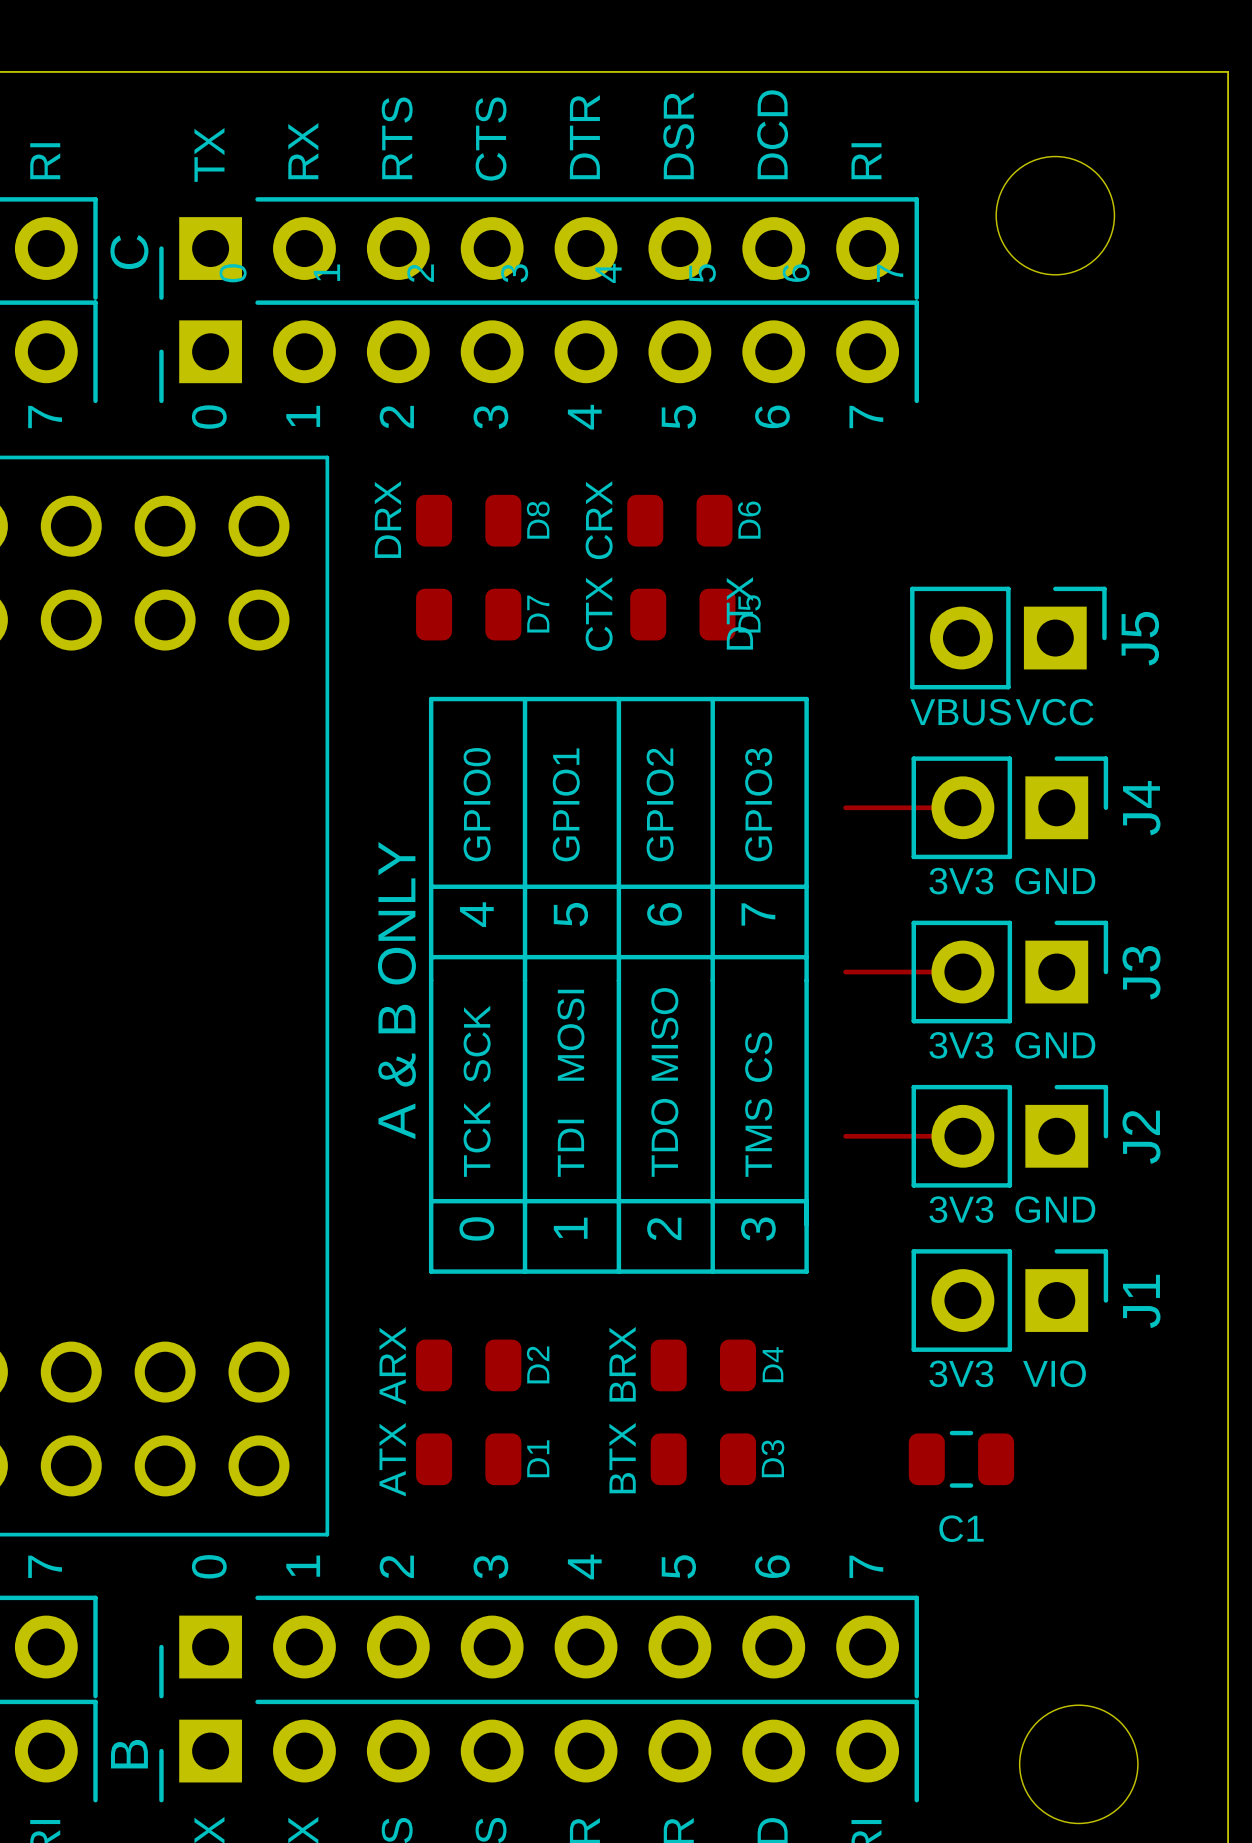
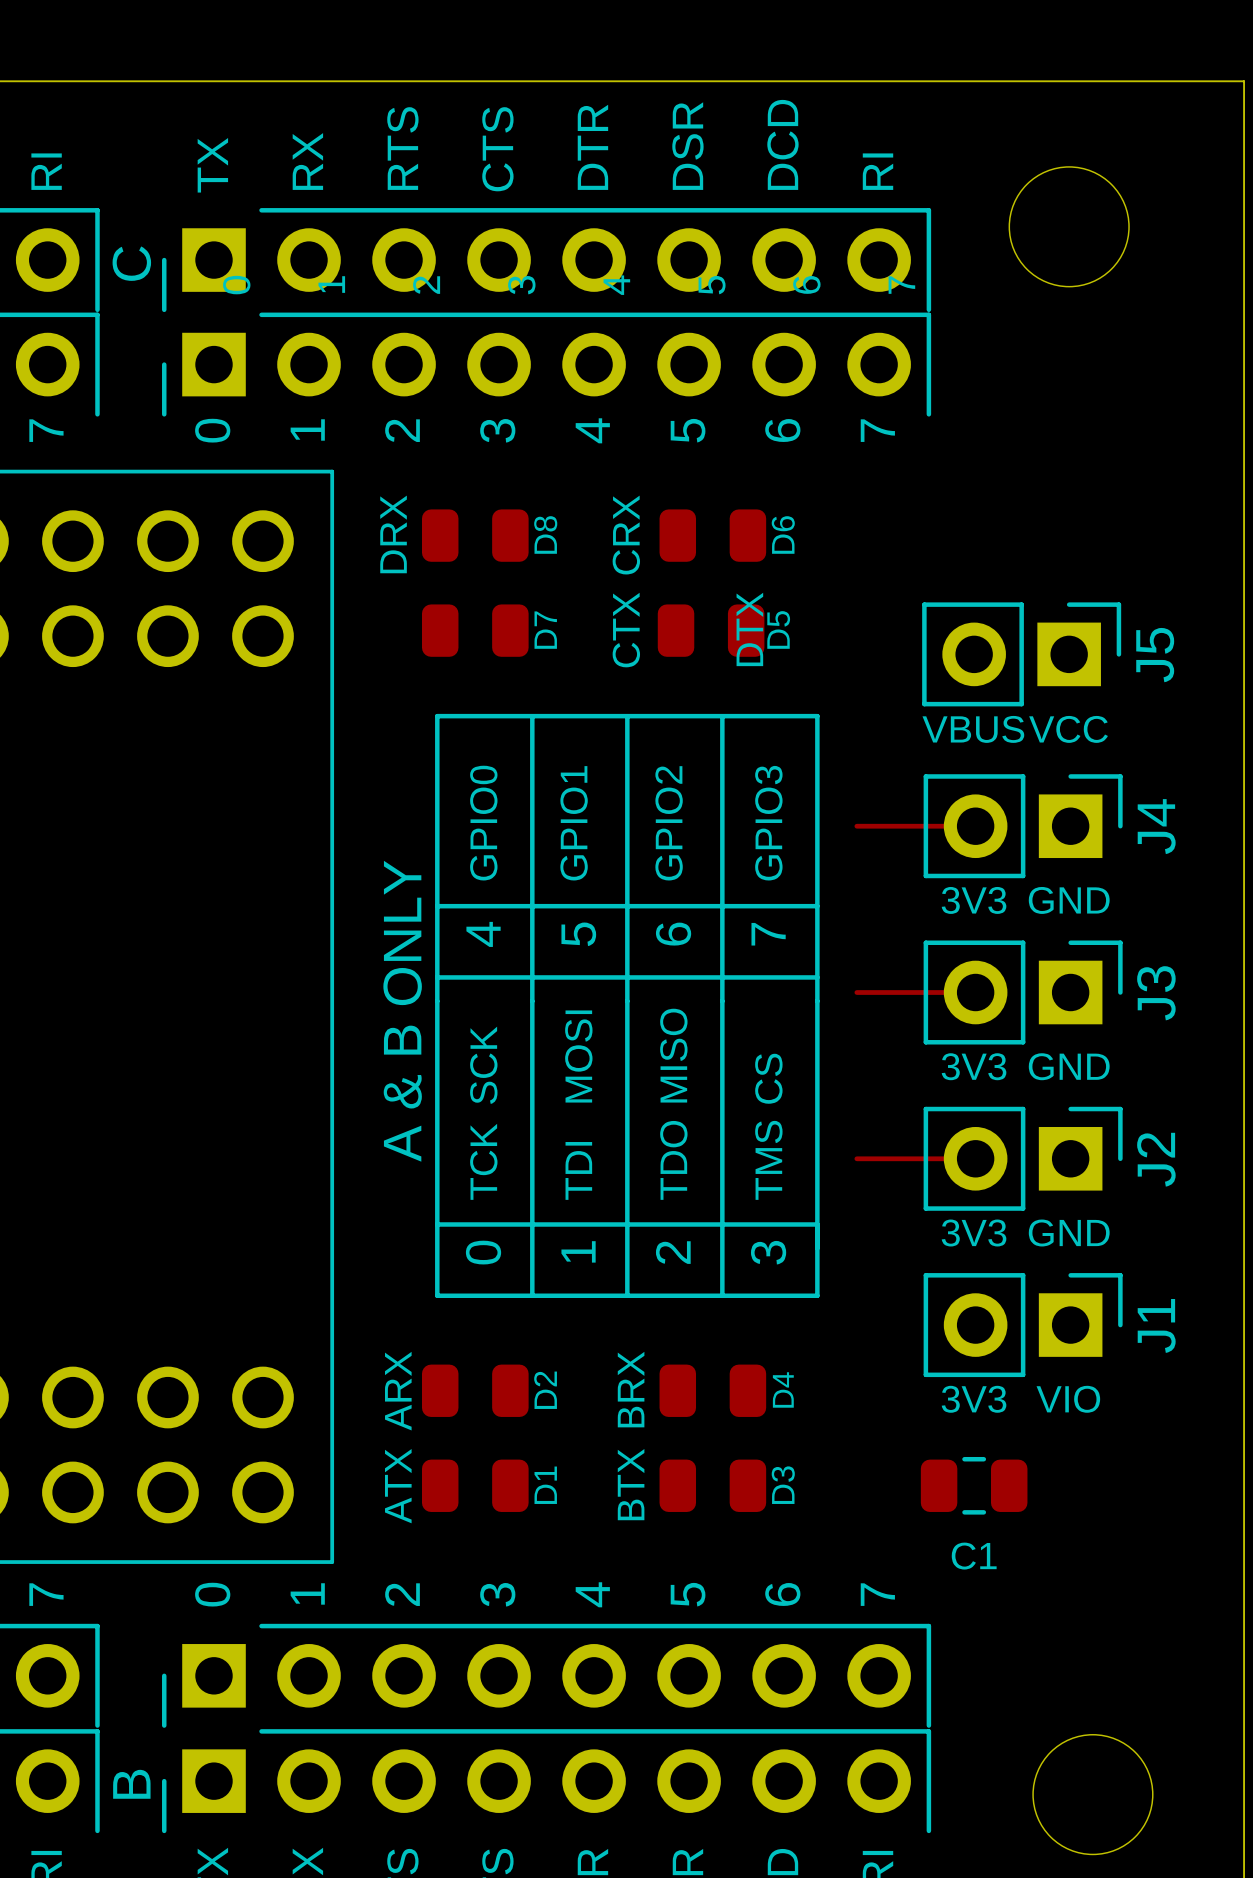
text position: CRX (599, 520) -> CRX (626, 535)
D6 position: (679, 520) -> (712, 535)
text position: CTX (599, 614) -> CTX (626, 630)
D5 position: (682, 614) -> (711, 630)

